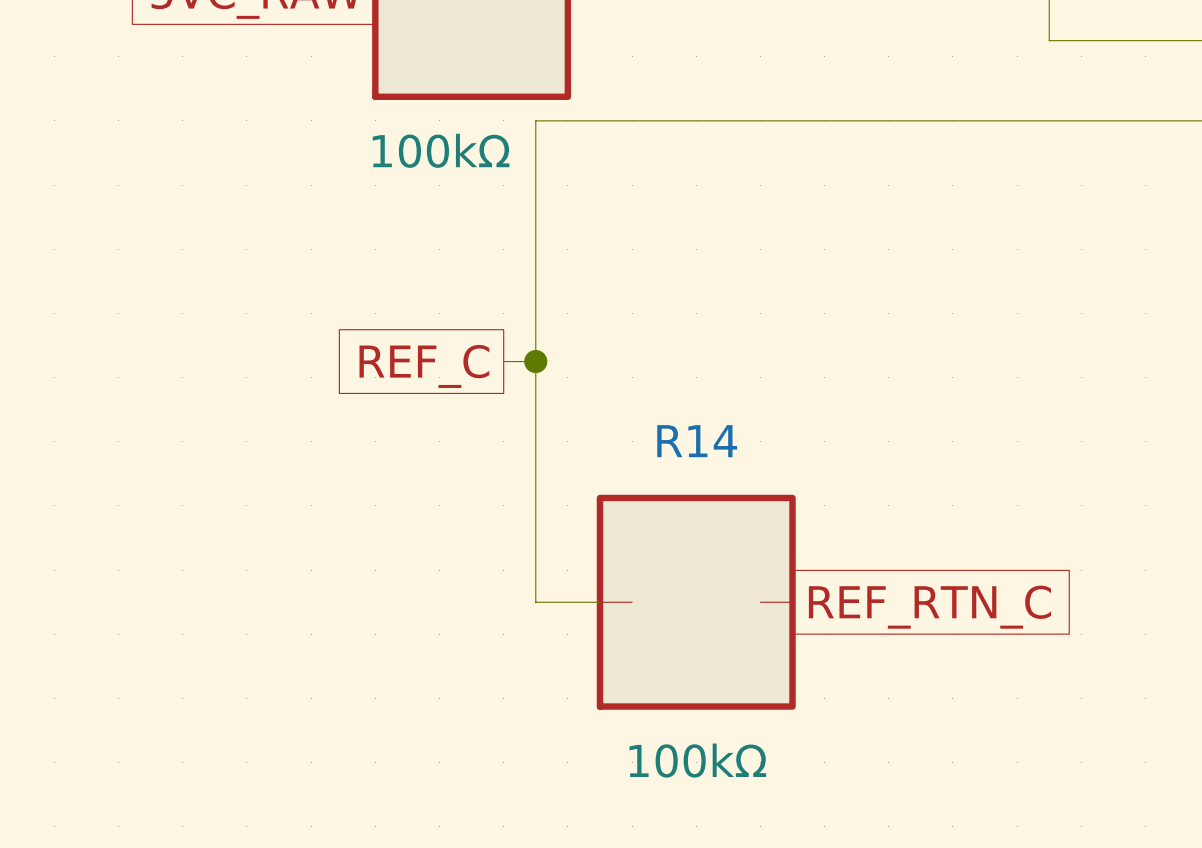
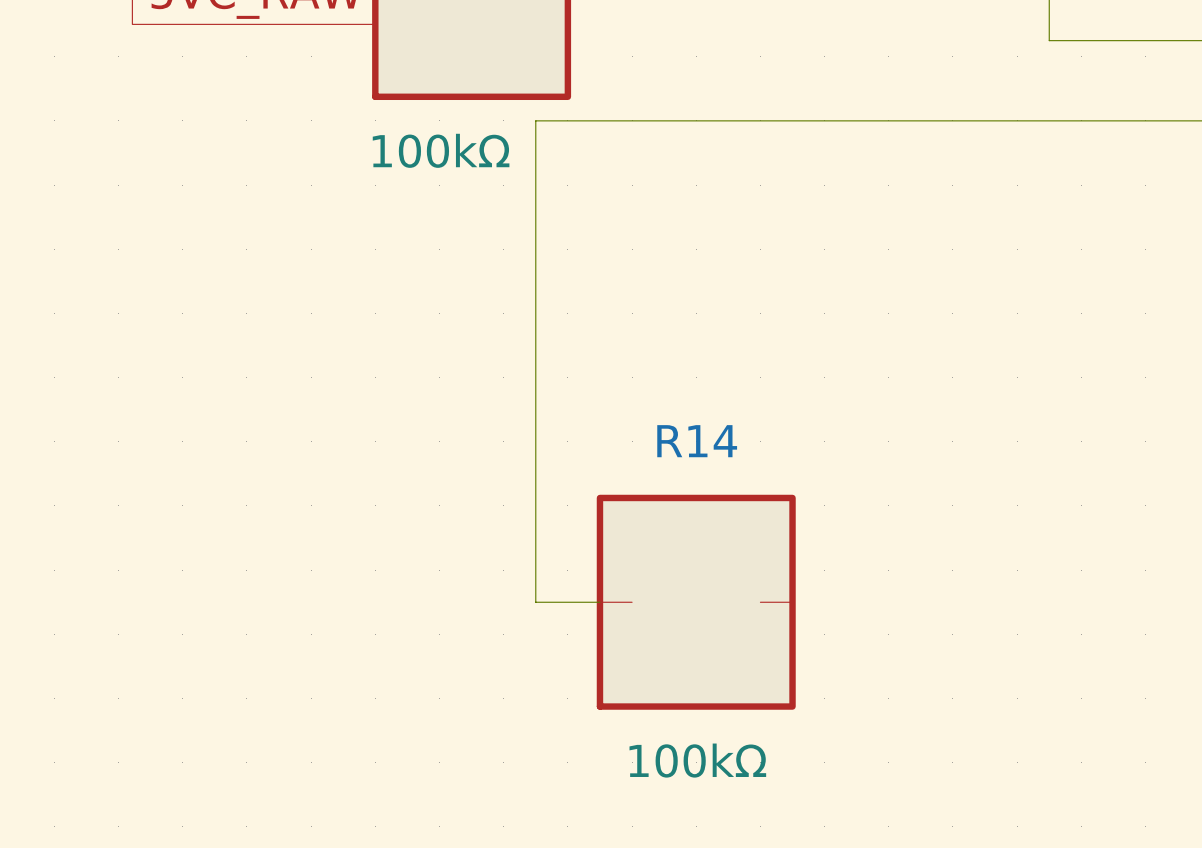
wire: (503, 361) (535, 361) -> none
junction: (535, 361) -> none
global label: REF_C (424, 366) -> none
global label: REF_RTN_C (929, 607) -> none

